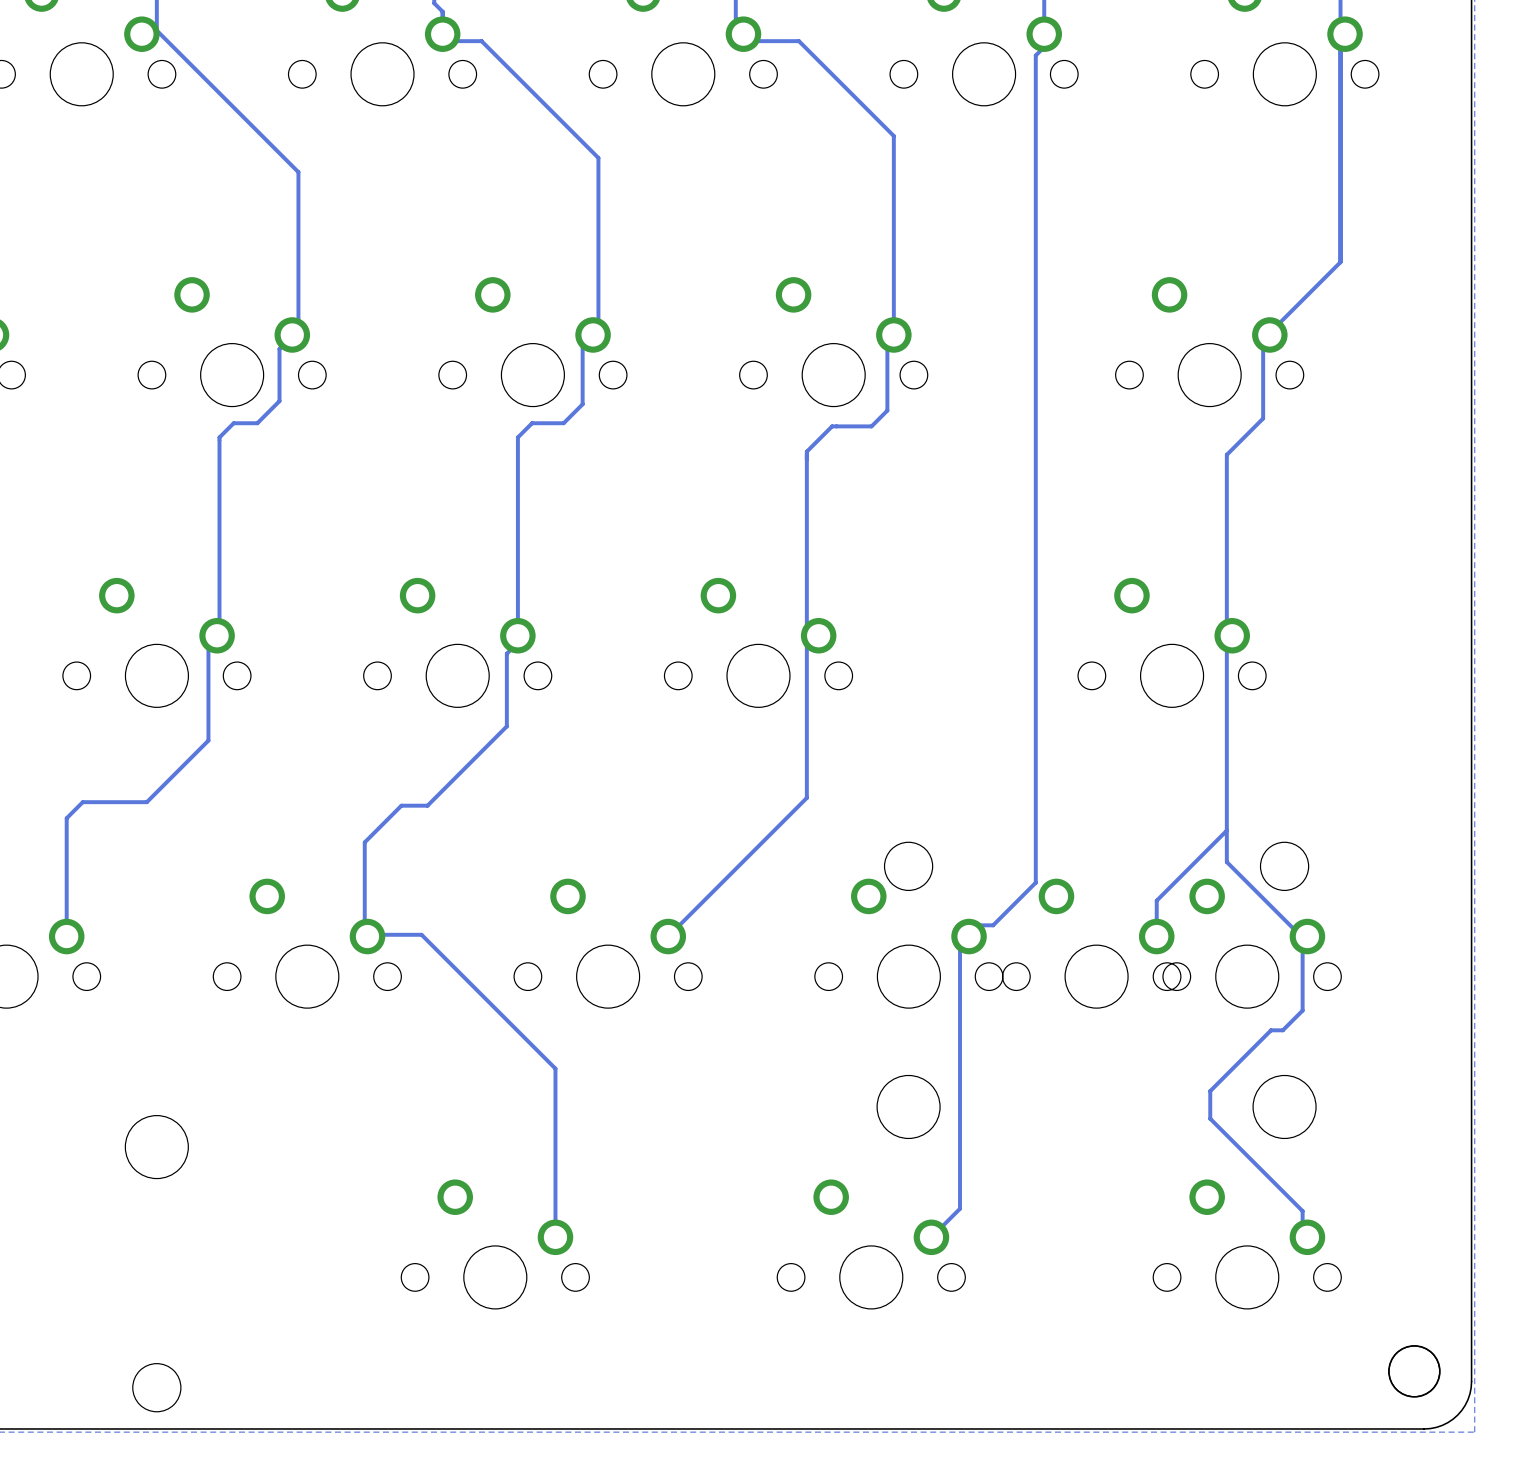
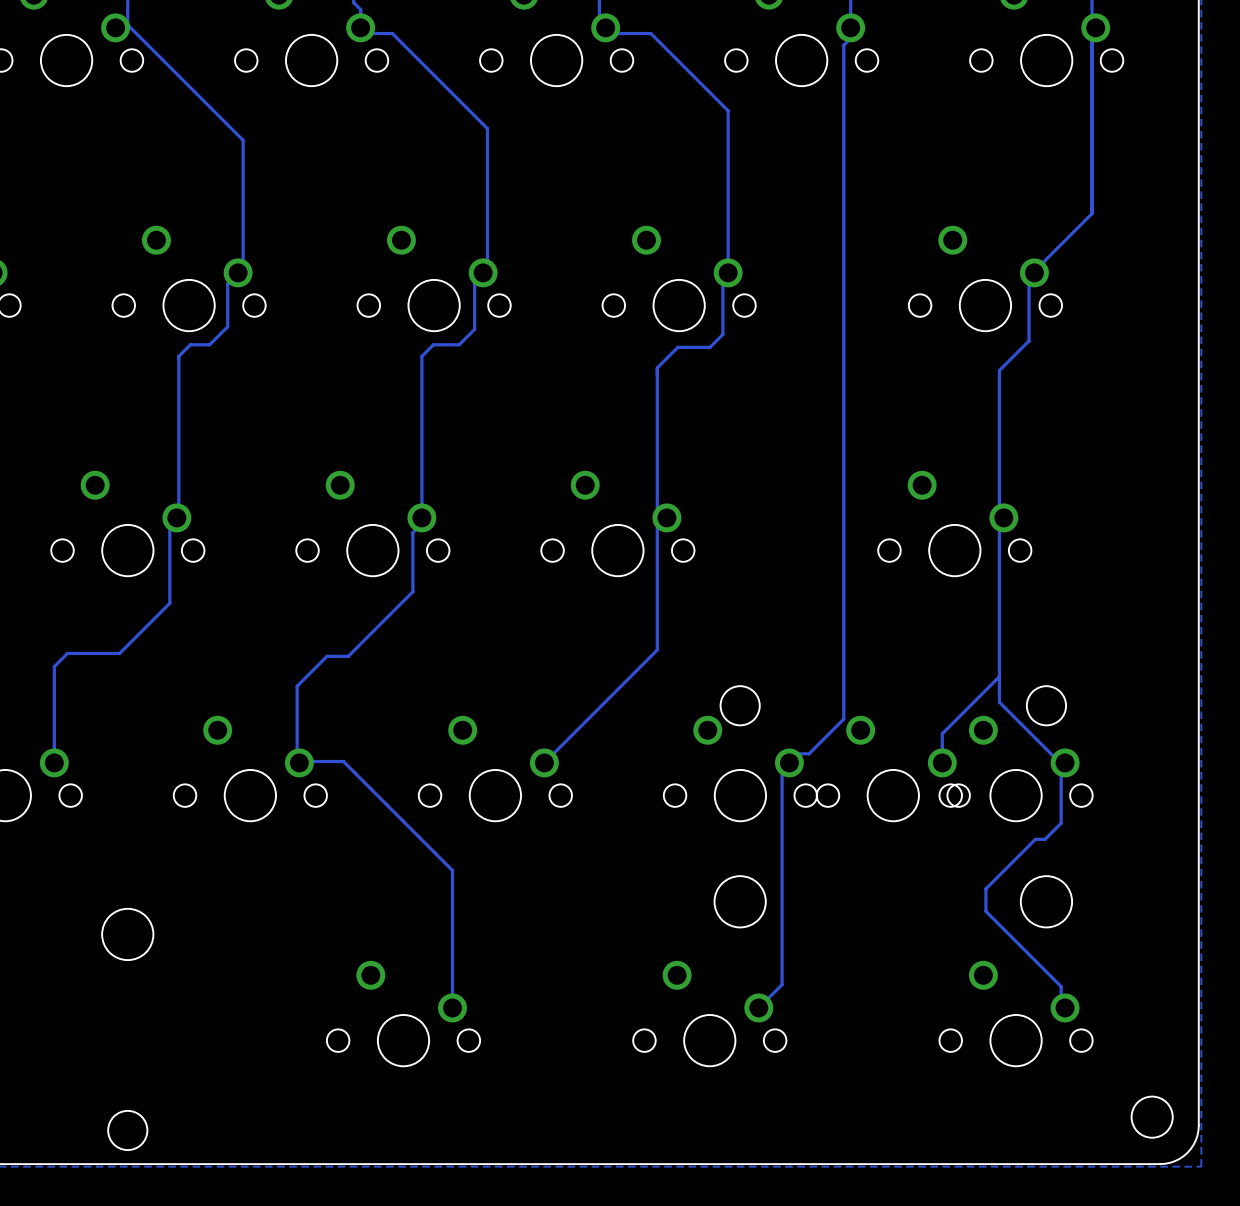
round board edge: [1388, 1345, 1441, 1398] -> none

